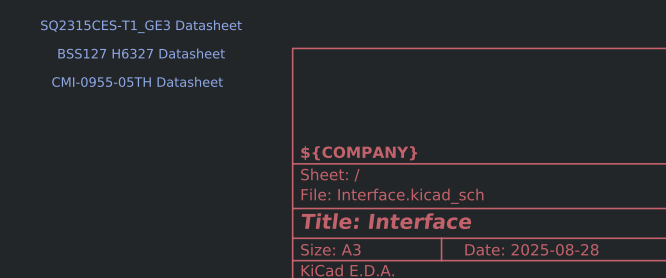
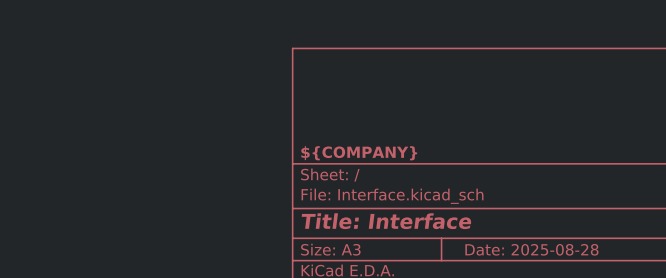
text: SQ2315CES-T1_GE3 Datasheet (141, 26) -> none
text: BSS127 H6327 Datasheet (141, 53) -> none
text: CMI-0955-05TH Datasheet (137, 81) -> none

